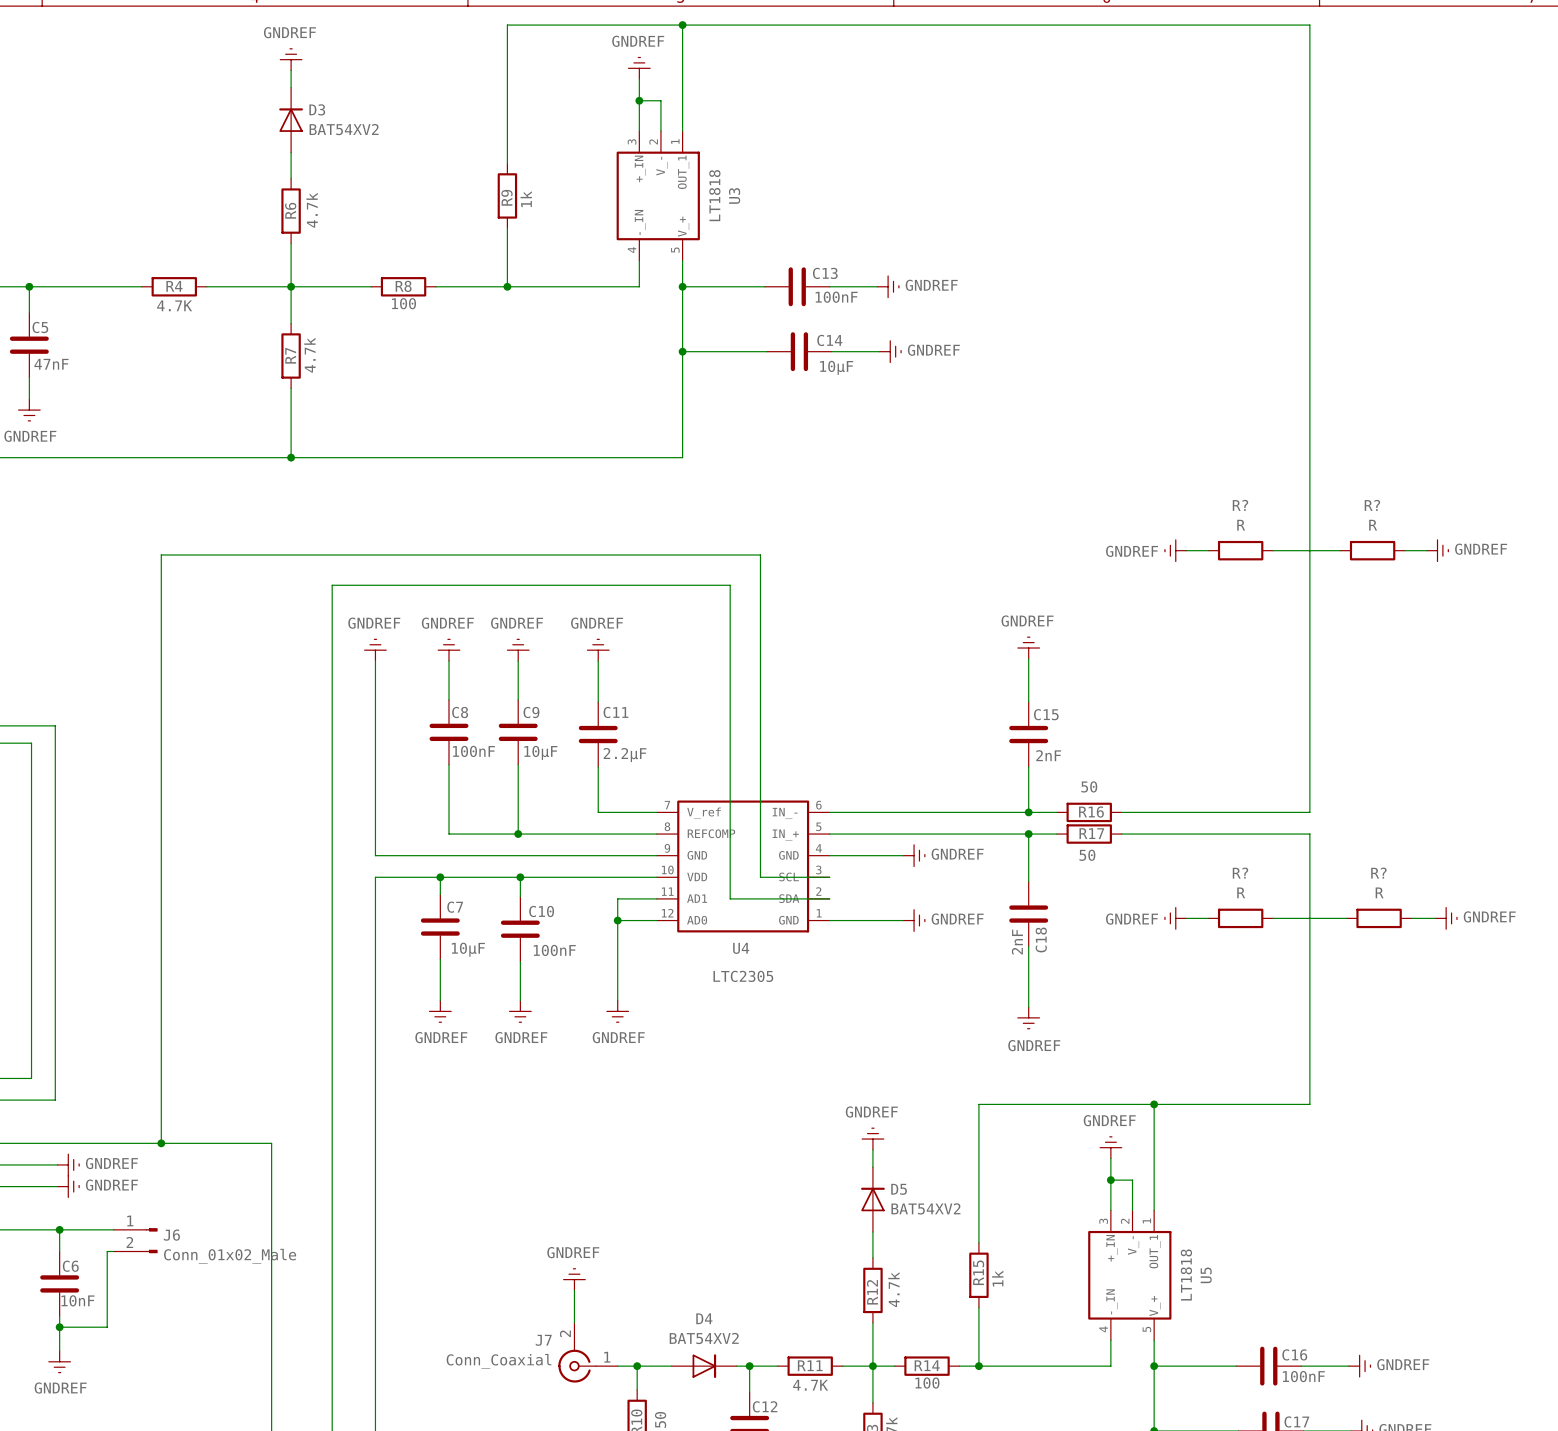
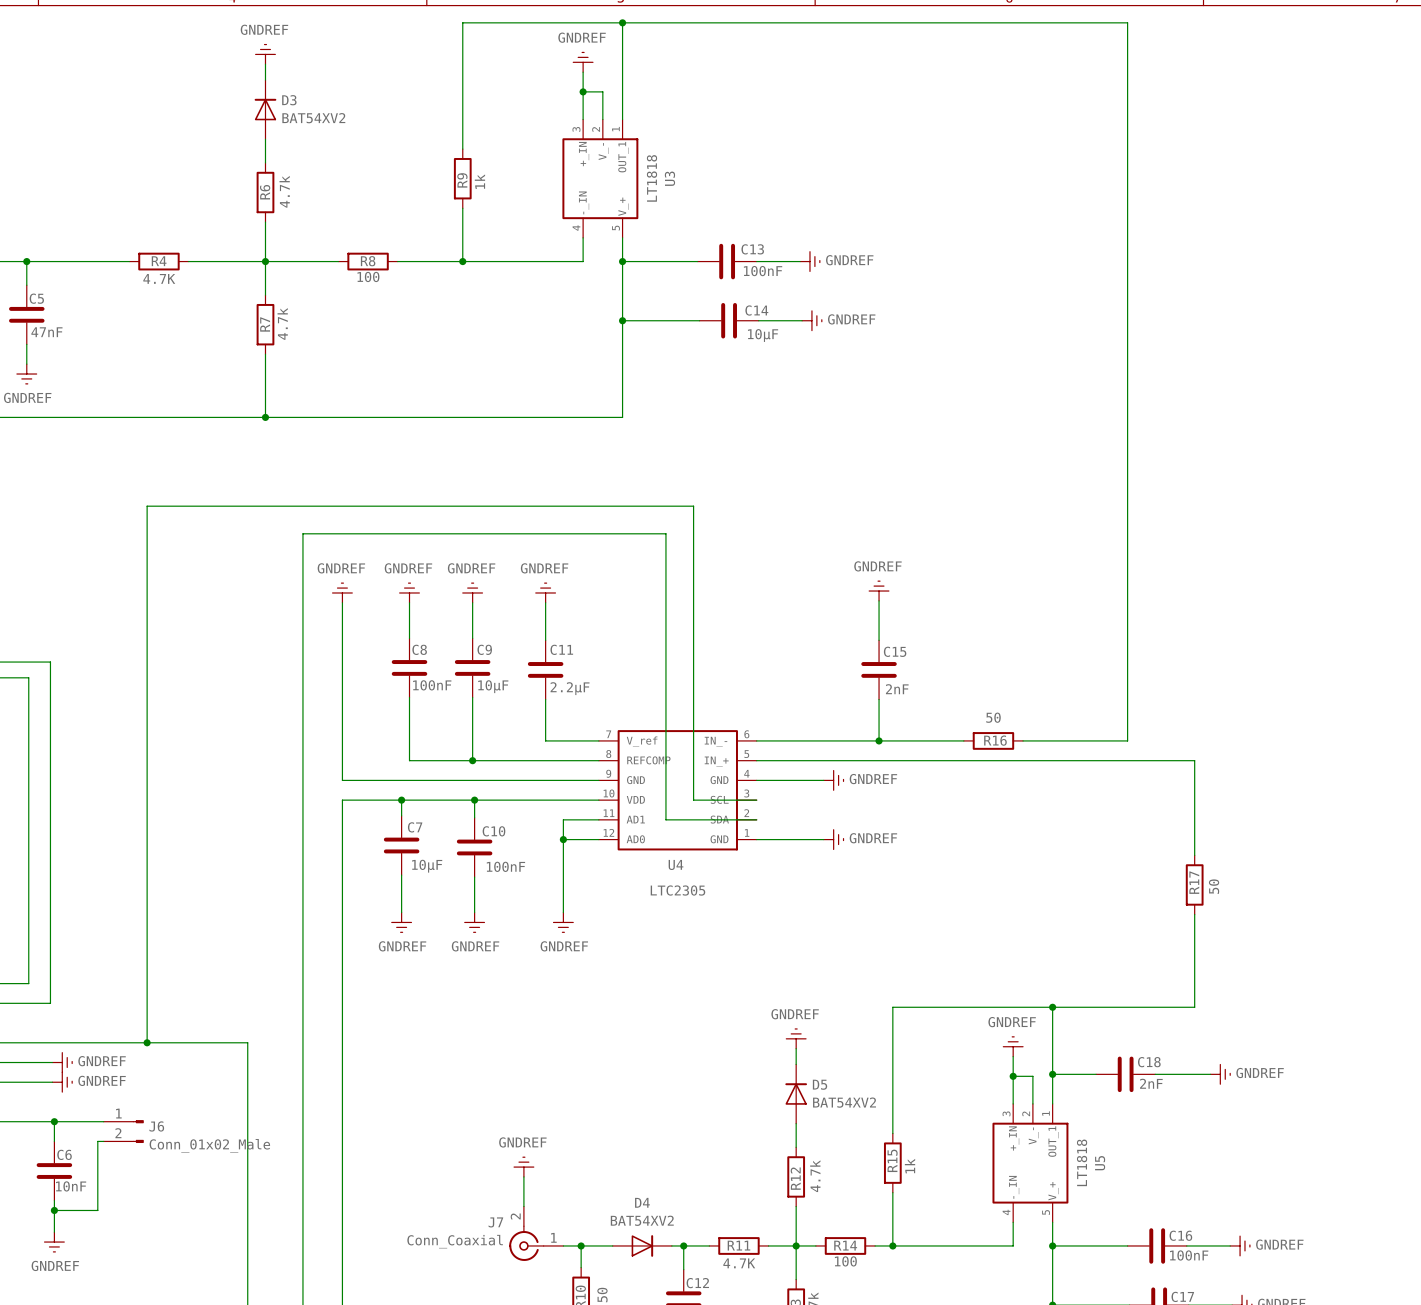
wire: (1236, 25) (1309, 25) (1309, 812) (1236, 812) -> (1127, 22) (1127, 740)
power symbol: GNDREF (1175, 550) -> none
wire: (1186, 550) (1208, 550) -> none
R?: R (1240, 550) -> none
wire: (1273, 550) (1340, 550) -> none
R?: R (1372, 550) -> none
wire: (1405, 550) (1426, 550) -> none
power symbol: GNDREF (1437, 550) -> none
power symbol position: GNDREF (1028, 648) -> GNDREF (879, 591)
wire: (1028, 658) (1028, 702) -> (879, 600) (879, 640)
C15 position: (1028, 734) -> (879, 669)
wire: (1028, 766) (1028, 812) -> (879, 699) (879, 740)
junction: none -> (879, 740)
junction: (1028, 812) -> none
wire: (1028, 834) (1028, 881) -> none
junction: (1028, 834) -> none
wire: none -> (963, 760) (1023, 760)
R17 rotation: 0° (1089, 834) -> 90° clockwise (1194, 884)
R17 position: (1089, 834) -> (1194, 884)
R17 value position: 50 (1087, 855) -> 50 (1214, 886)
C18 rotation: 0° (1028, 914) -> 90° clockwise (1125, 1074)
C18 position: (1028, 914) -> (1125, 1074)
power symbol: GNDREF (1175, 918) -> none
wire: (1186, 918) (1208, 918) -> none
R?: R (1240, 918) -> none
wire: (1273, 918) (1346, 918) -> none
R?: R (1379, 918) -> none
wire: (1411, 918) (1435, 918) -> none
power symbol: GNDREF (1446, 918) -> none
wire: (1309, 937) (1309, 1002) -> none
C18 name position: C18 (1041, 939) -> C18 (1149, 1062)
C18 value position: 2nF (1017, 942) -> 2nF (1151, 1083)
wire: (1028, 946) (1028, 1007) -> none
power symbol: GNDREF (1028, 1017) -> none
wire: none -> (1052, 1074) (1096, 1074)
junction: none -> (1052, 1074)
wire: none -> (1155, 1074) (1210, 1074)
power symbol: none -> GNDREF (1220, 1074)

